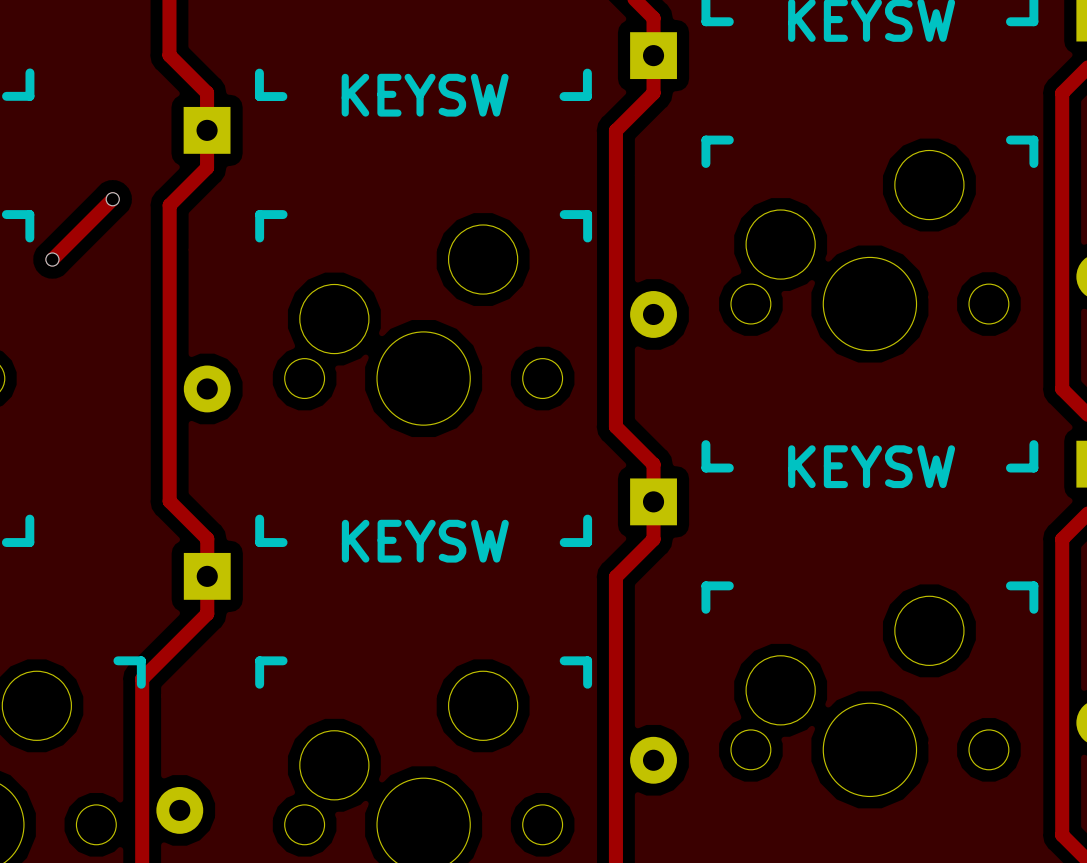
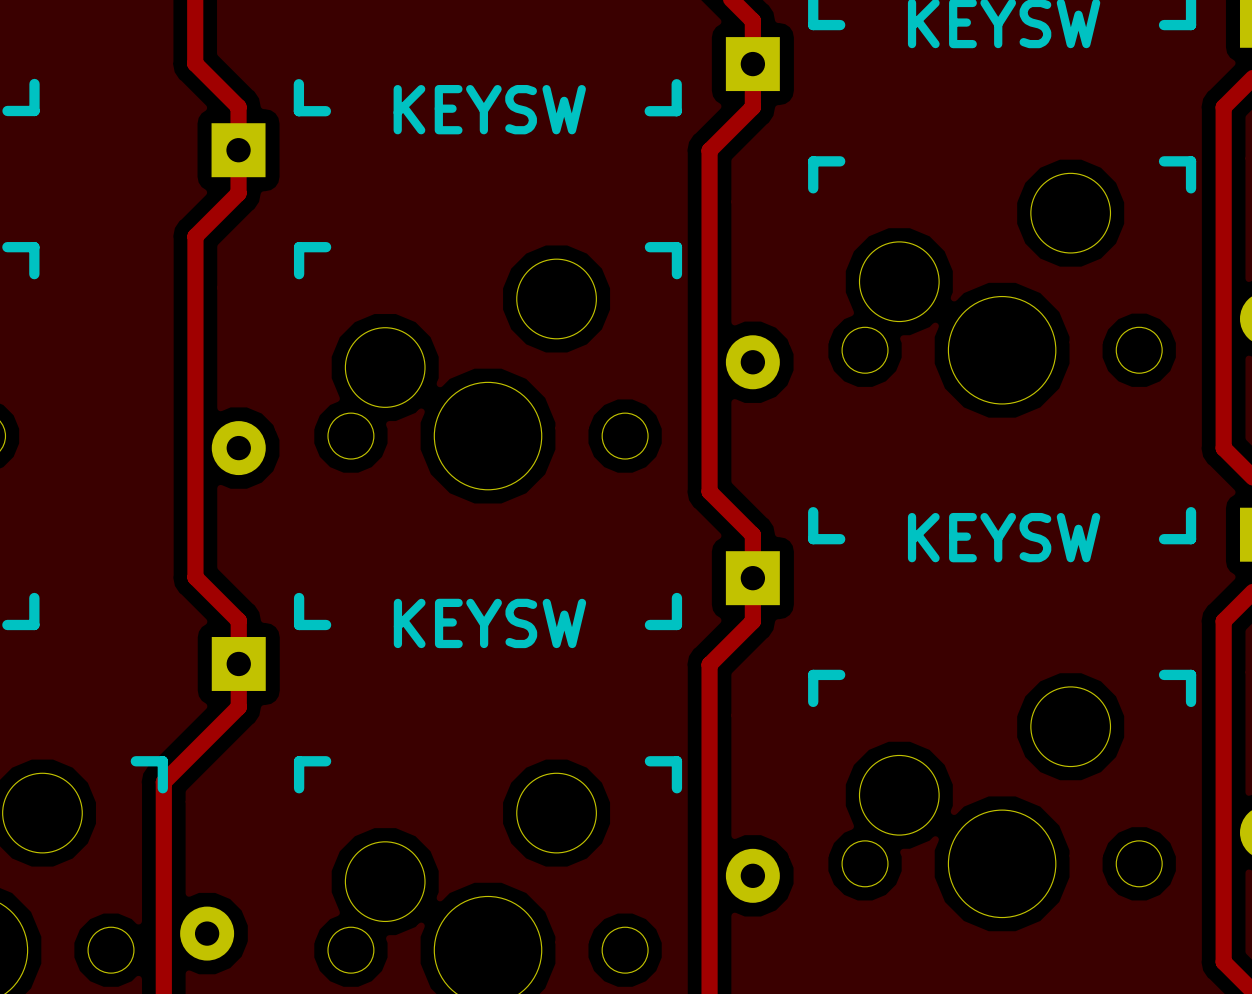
track: (112, 199) (52, 259) -> none
via: (112, 199) -> none
via: (52, 259) -> none

